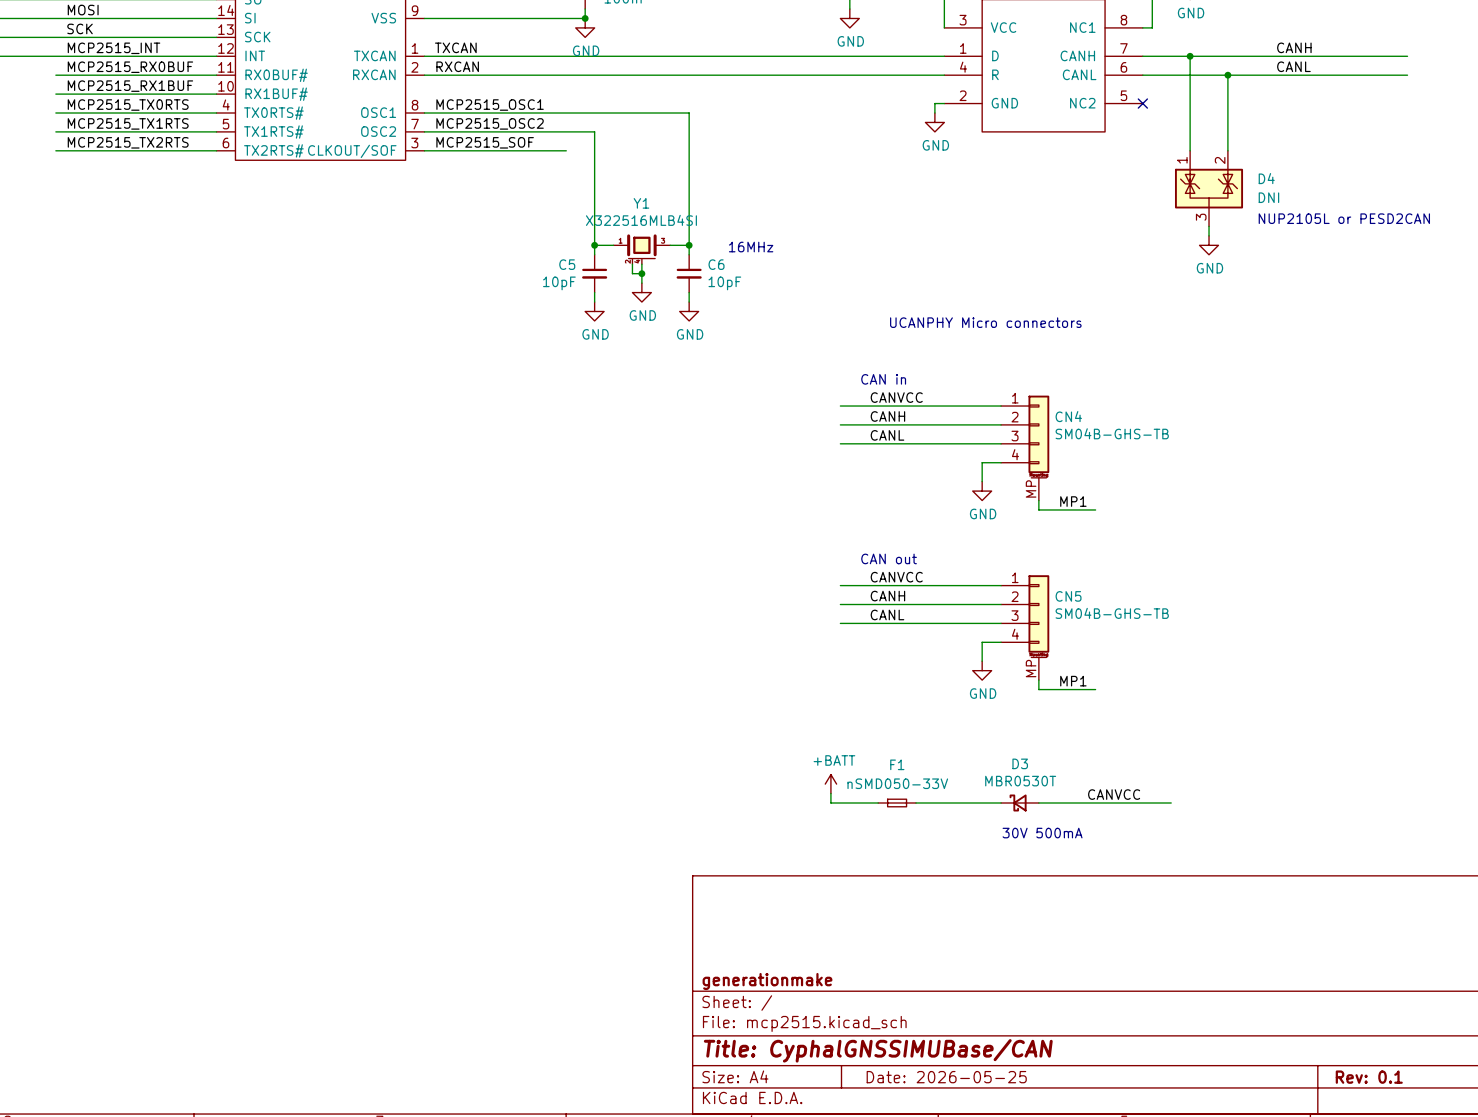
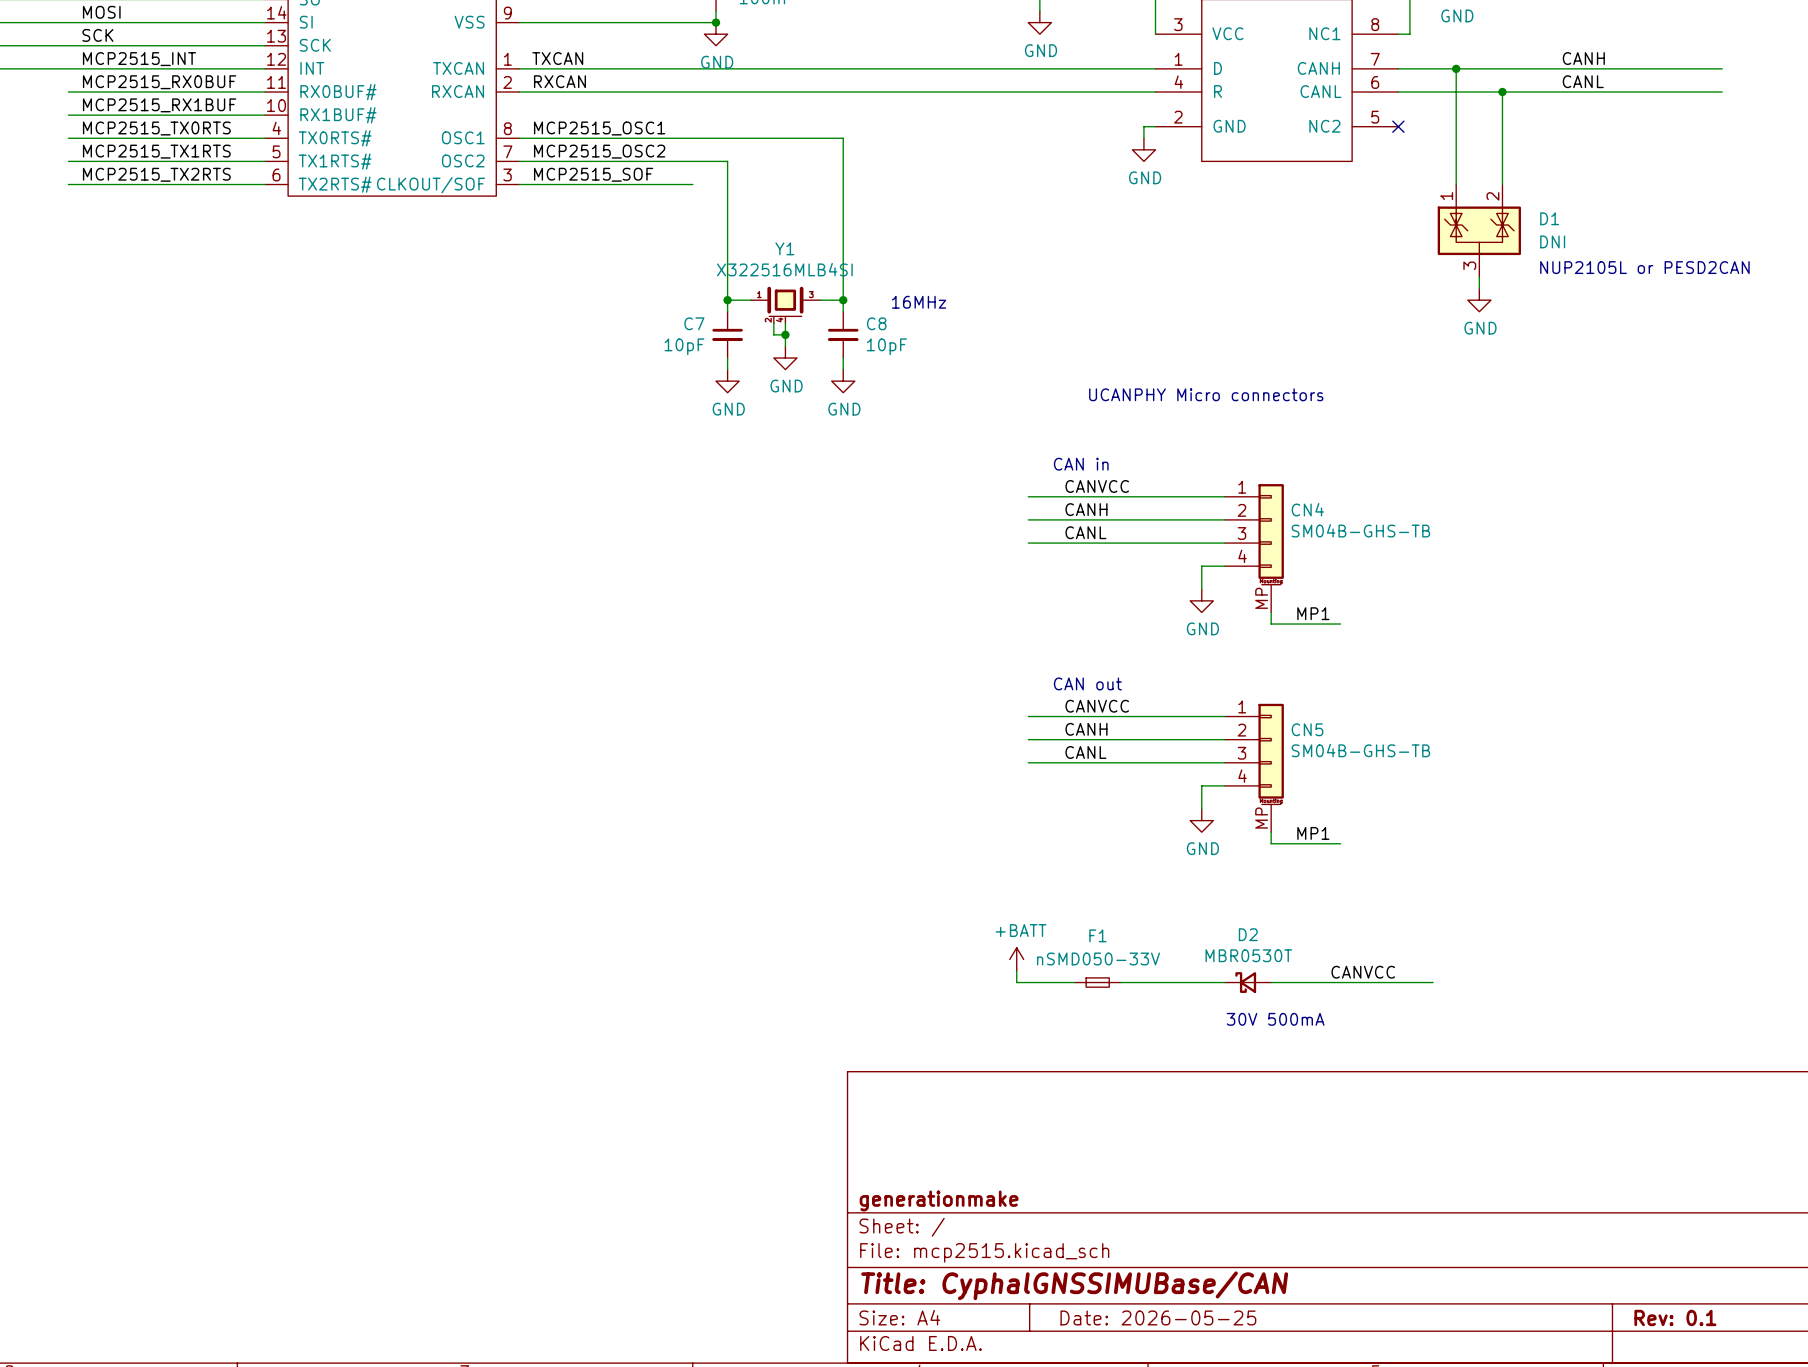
D4 name: D4 (1266, 178) -> D1 (1549, 218)
C5 name: C5 (567, 264) -> C7 (694, 323)
C6 name: C6 (716, 264) -> C8 (876, 323)
D3 name: D3 (1020, 763) -> D2 (1248, 934)

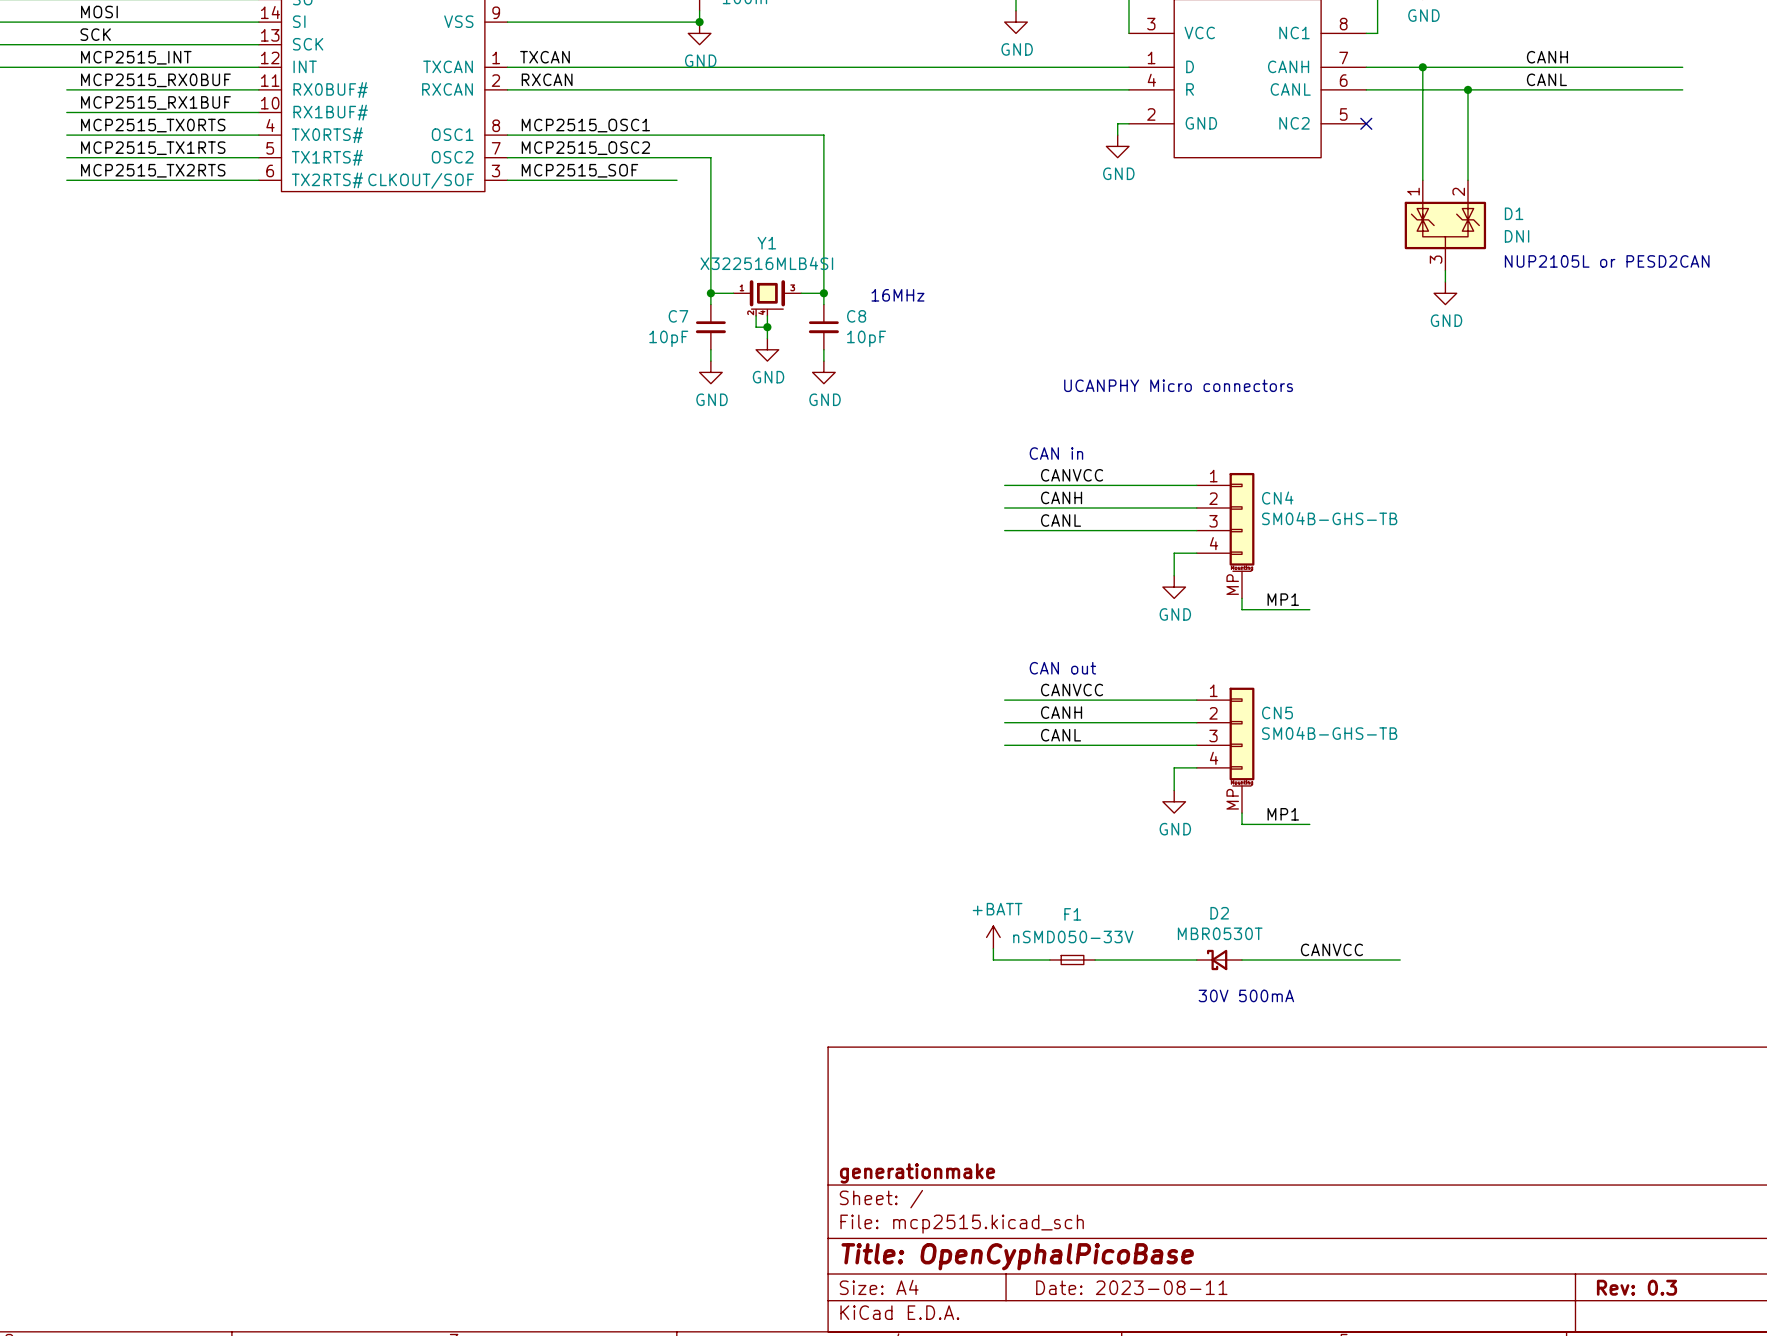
title block: Title: CyphalGNSSIMUBase/CAN (1074, 1285) -> Title: OpenCyphalPicoBase (1017, 1256)
title block: Date: 2026-05-25 (1158, 1317) -> Date: 2023-08-11 (1131, 1287)
title block: Rev: 0.1 (1675, 1317) -> Rev: 0.3 (1636, 1287)

